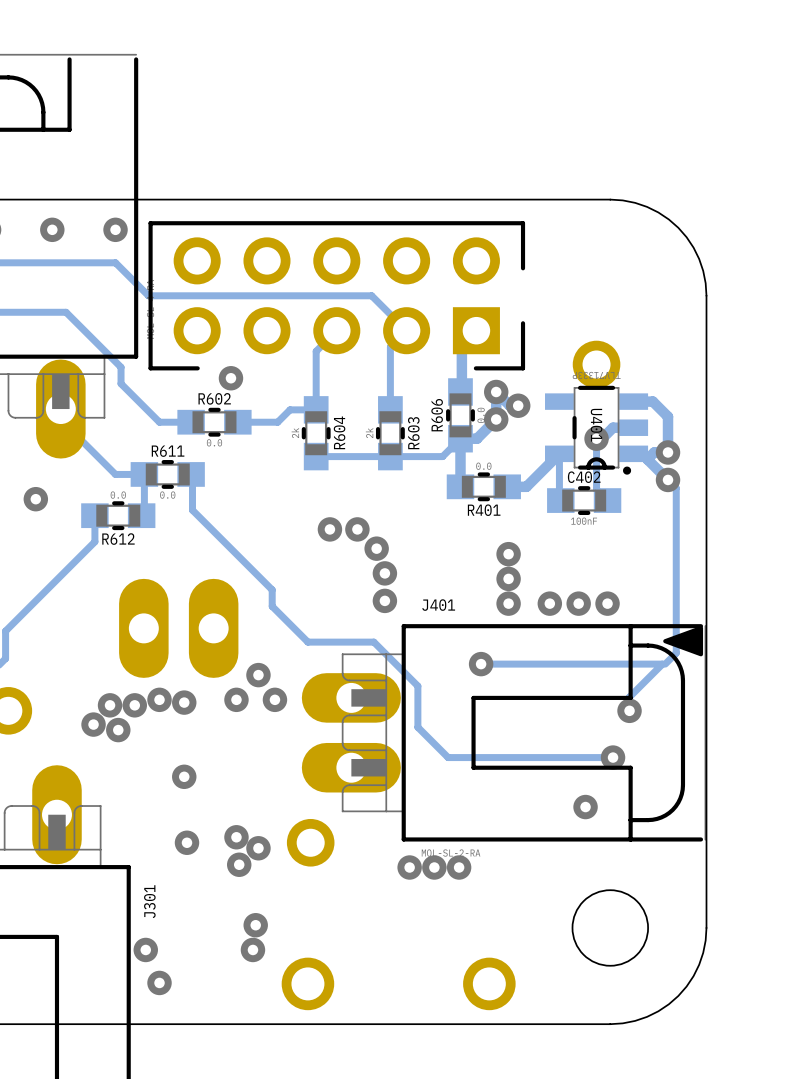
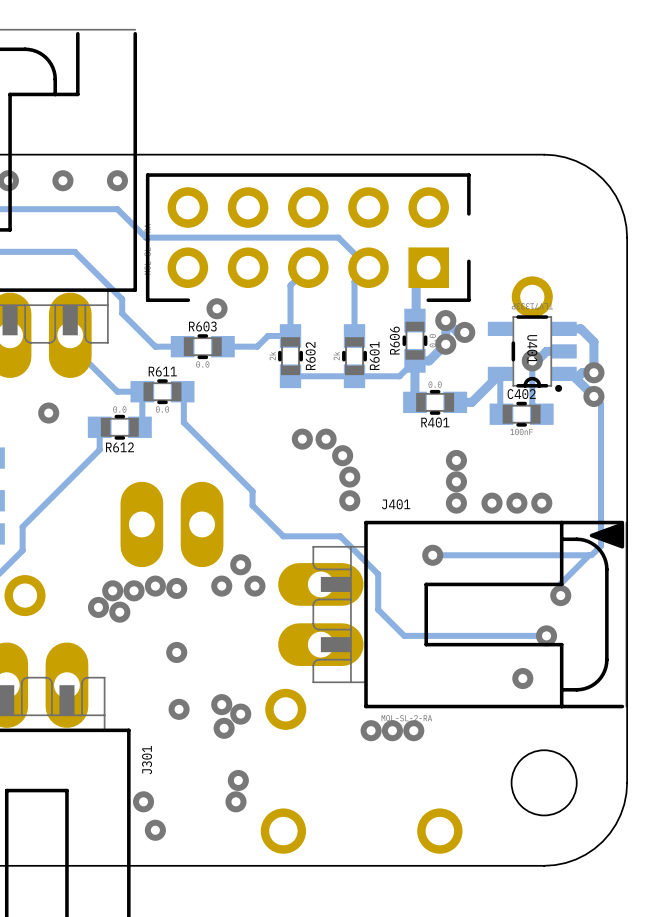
R602 name: R602 (214, 398) -> R603 (202, 326)
R604 name: R604 (339, 432) -> R602 (310, 355)
R603 name: R603 (413, 433) -> R601 (374, 355)

